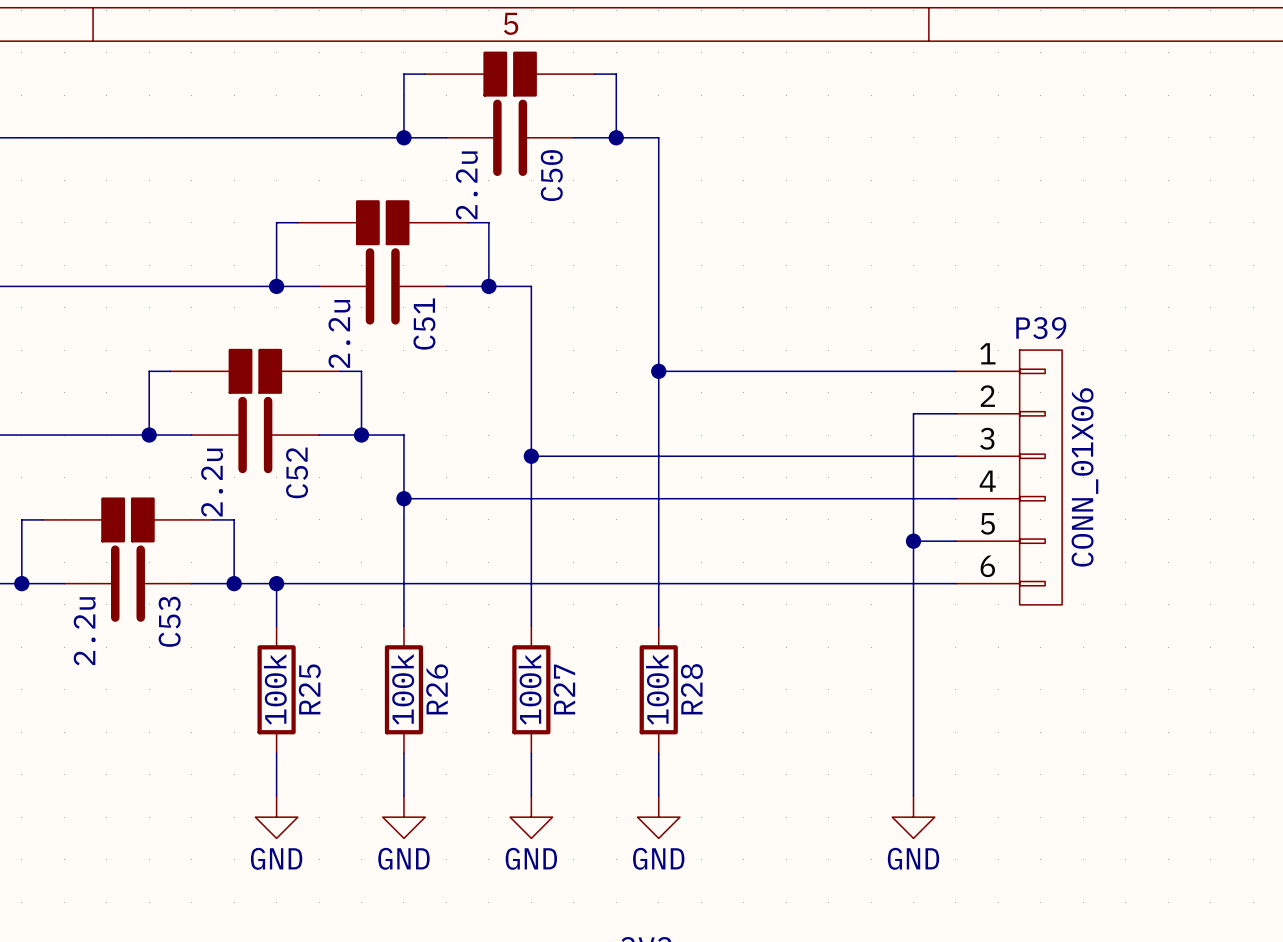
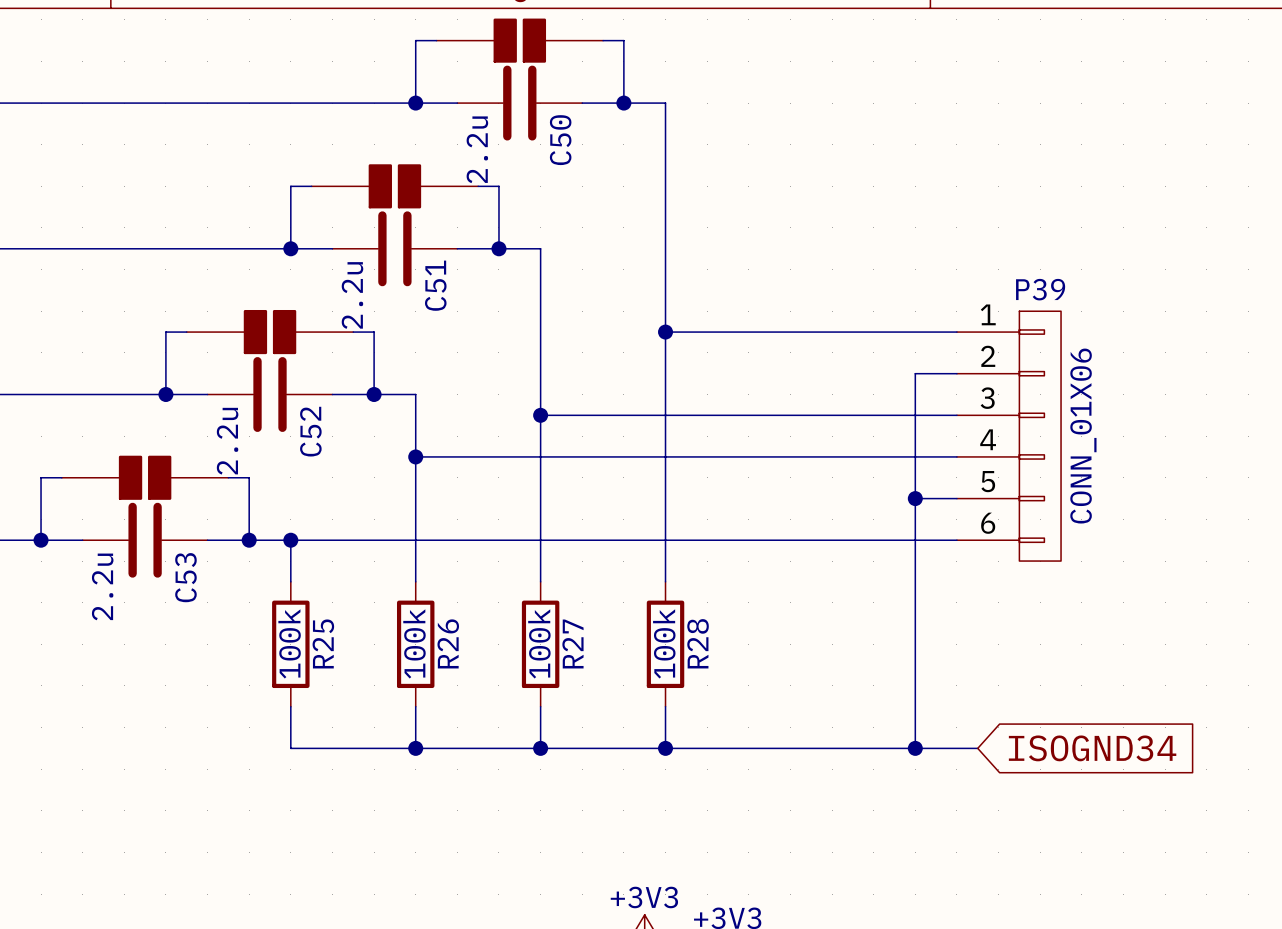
wire: none -> (290, 748) (977, 748)
junction: none -> (415, 748)
junction: none -> (540, 748)
junction: none -> (665, 748)
junction: none -> (915, 748)
global label: none -> ISOGND34 (1092, 748)
power symbol: GND (276, 817) -> none
power symbol: GND (403, 817) -> none
power symbol: GND (531, 817) -> none
power symbol: GND (658, 817) -> none
power symbol: GND (913, 817) -> none

